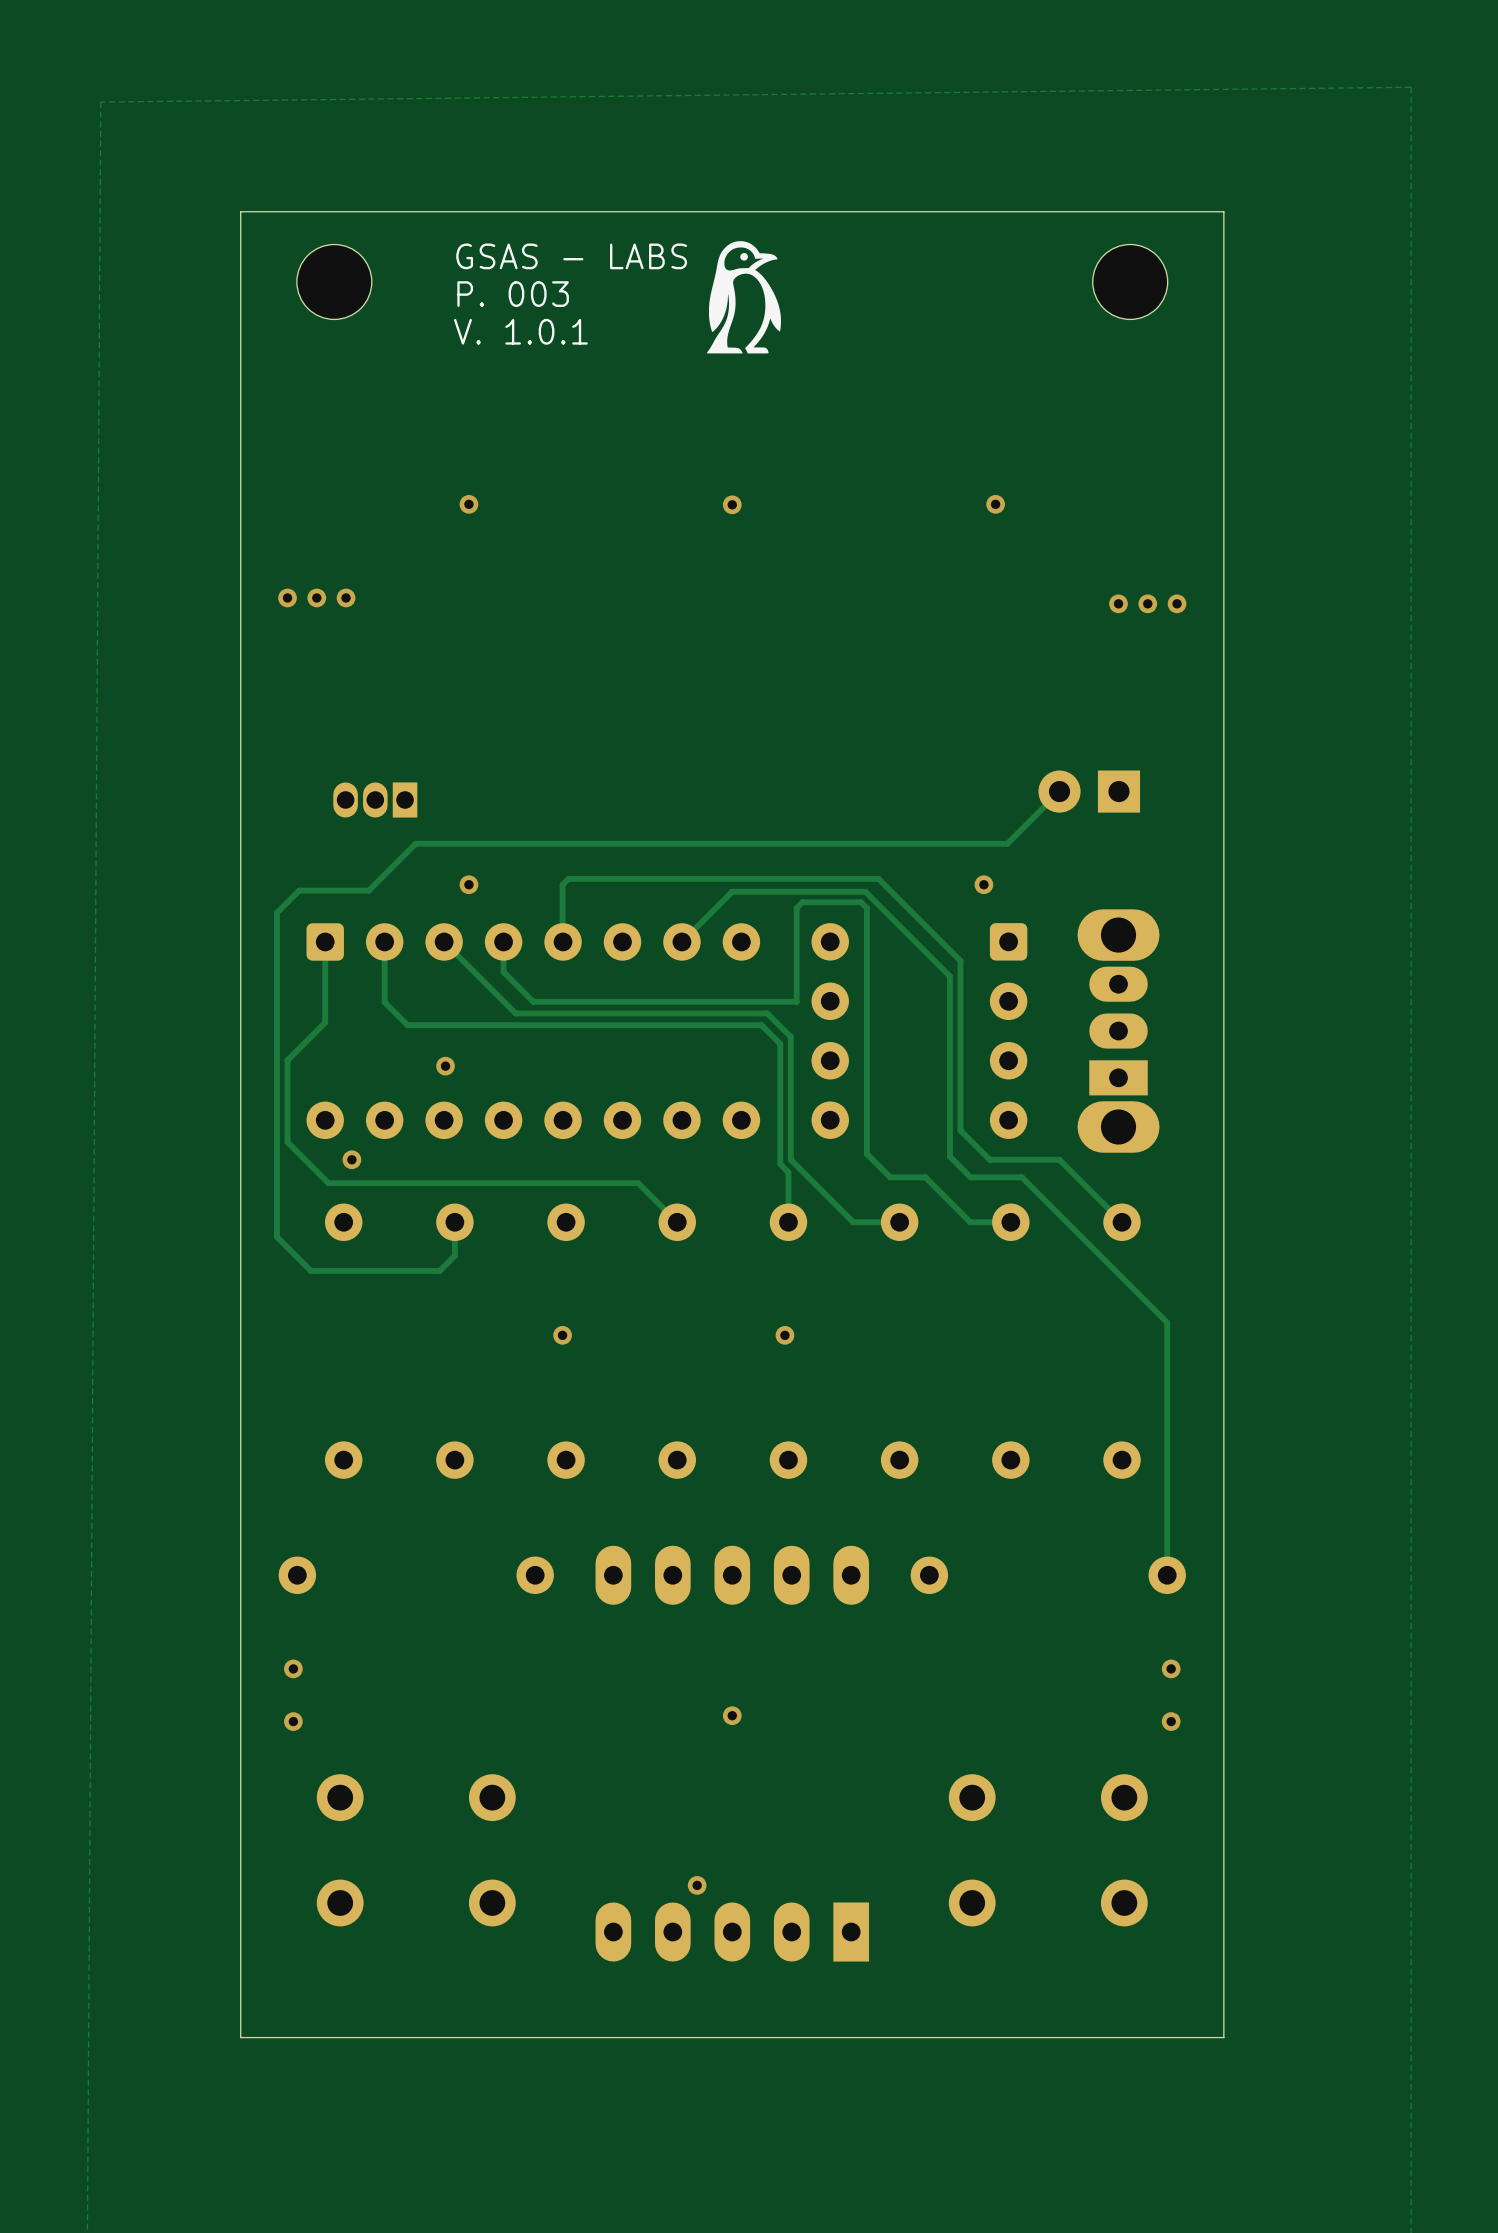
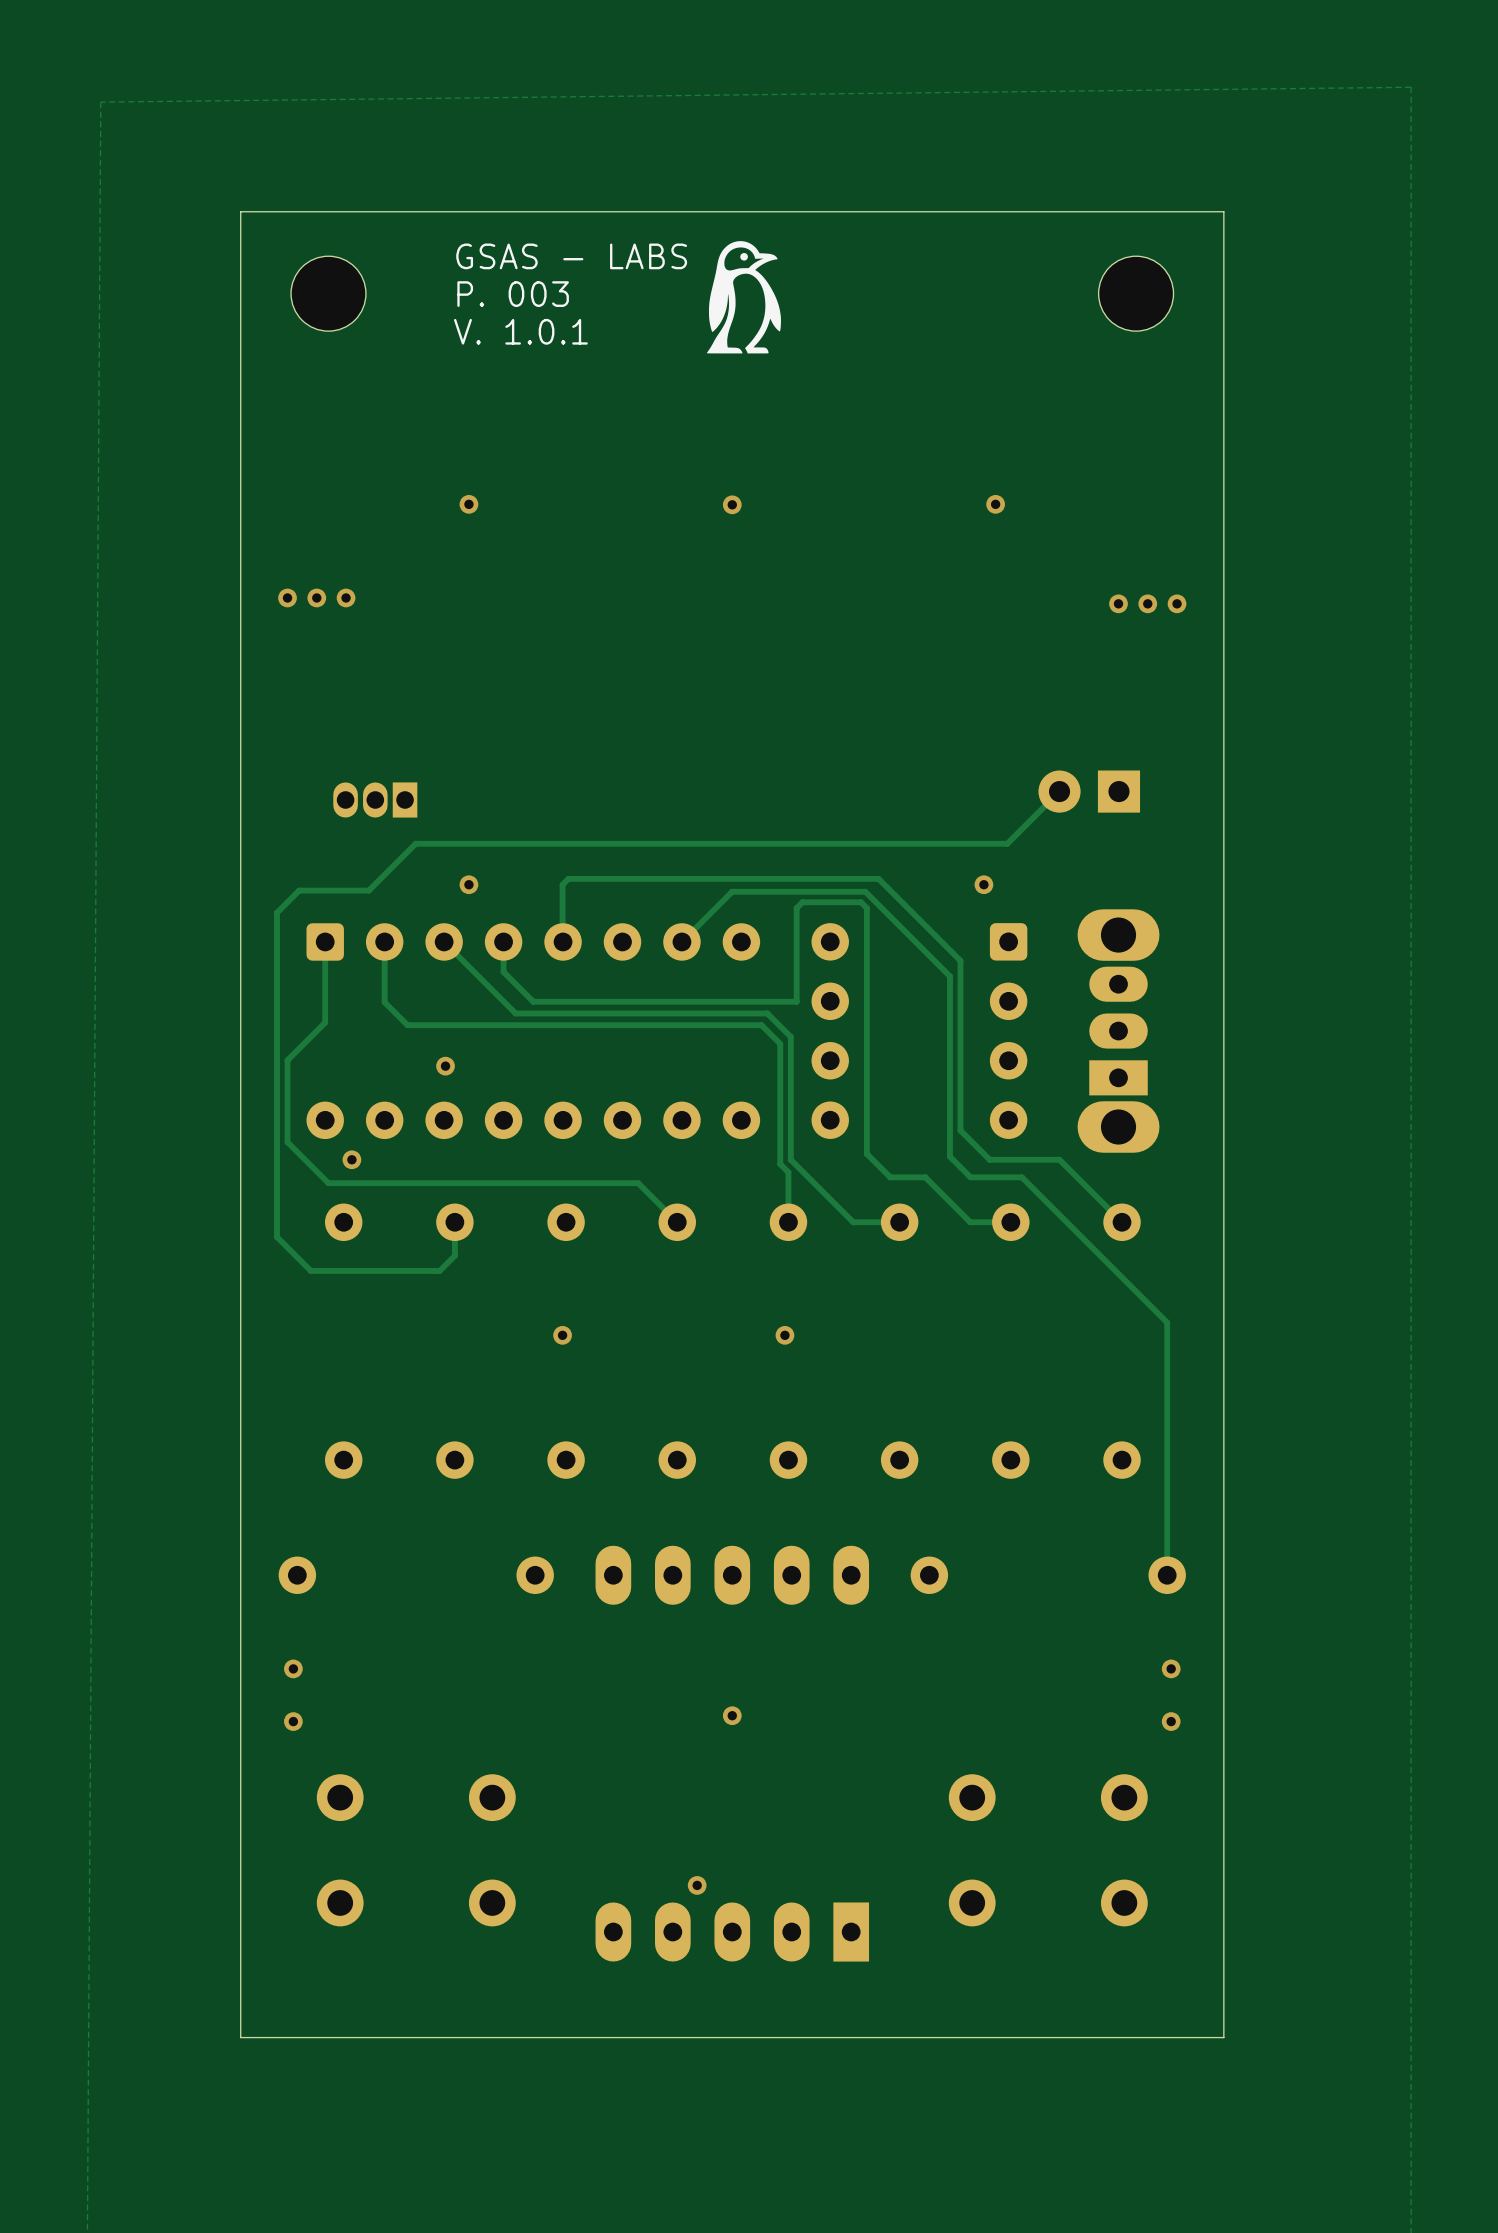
part position: (334, 281) -> (328, 293)
part position: (1130, 281) -> (1136, 293)

